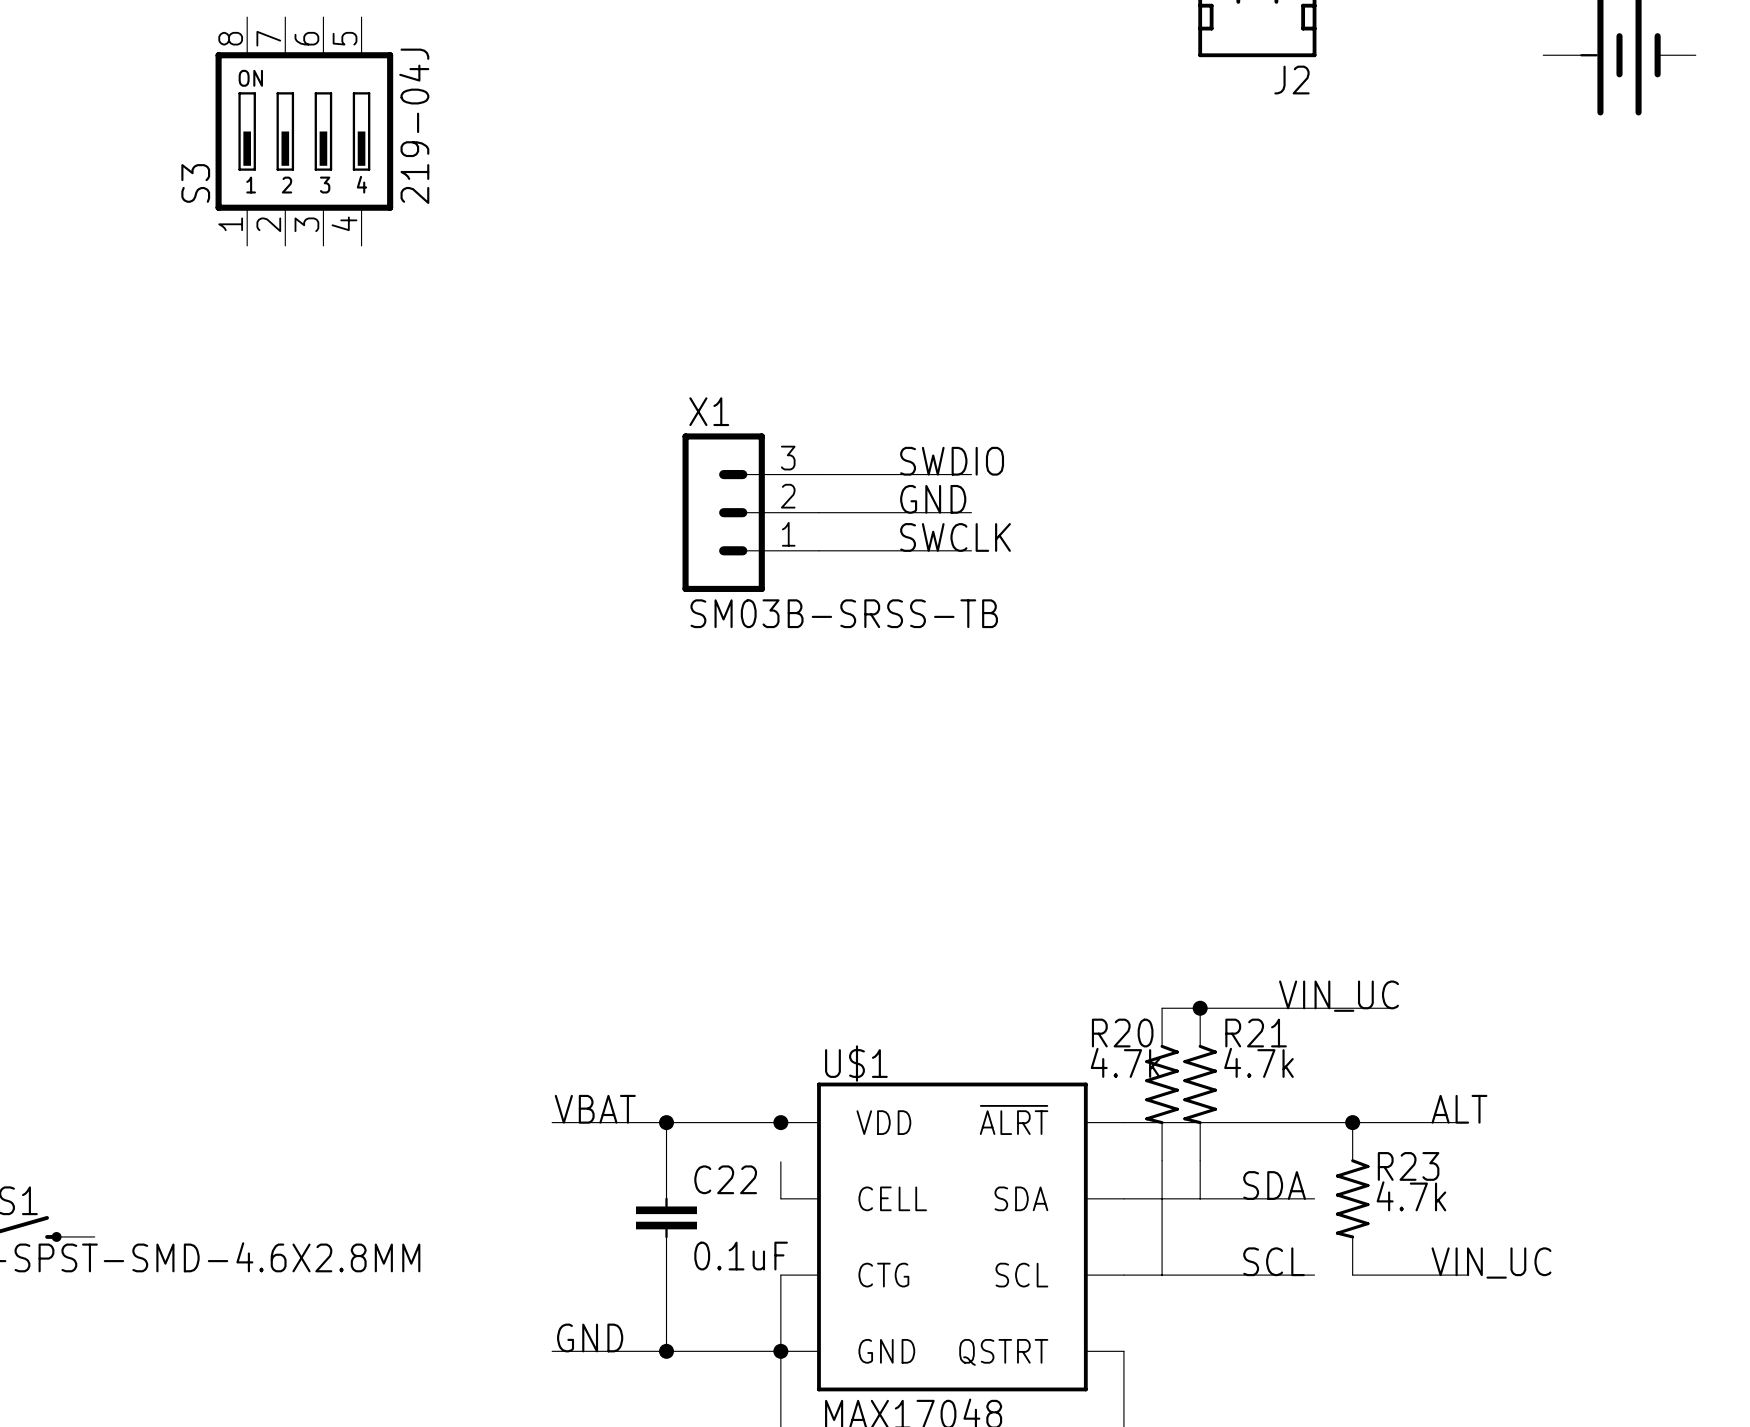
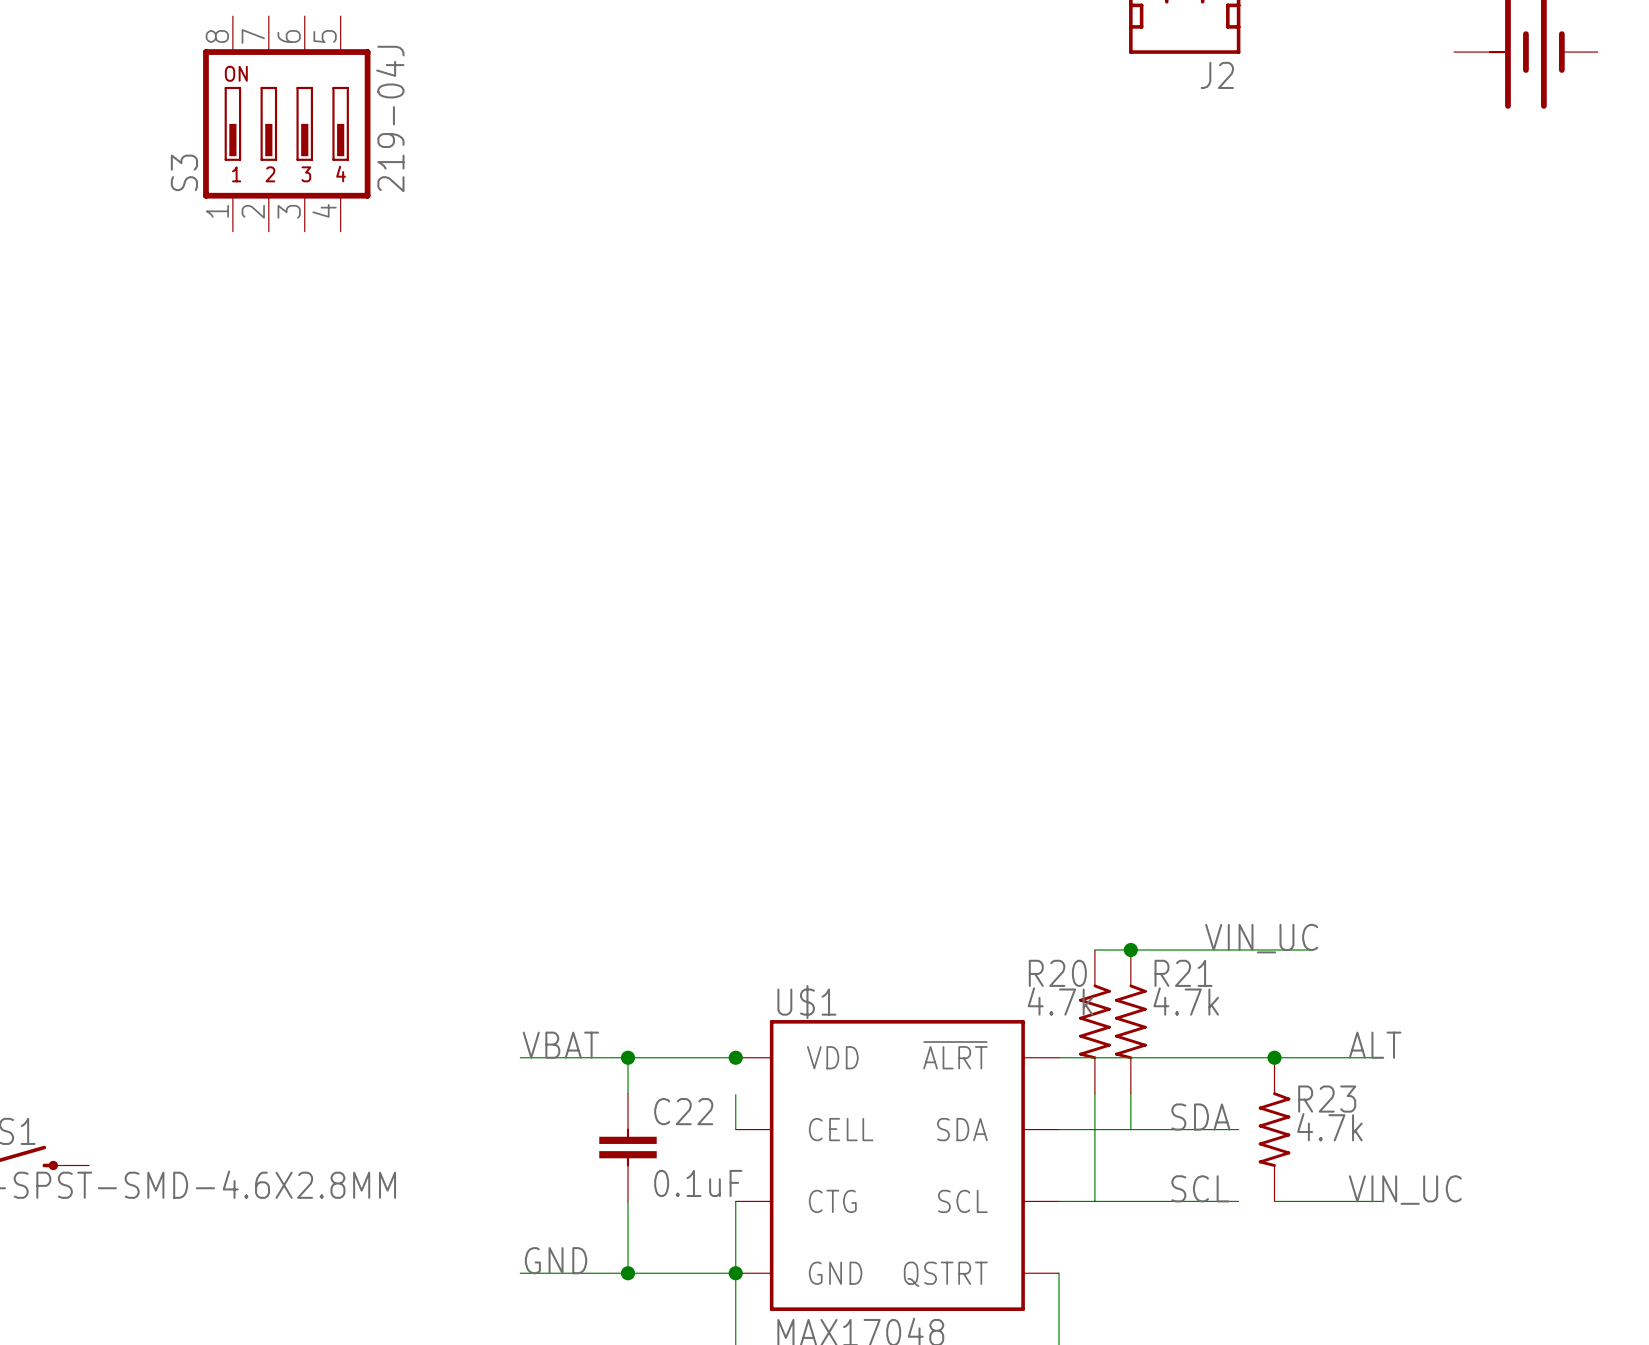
label: SWDIO (952, 461) -> none
wire: (818, 474) (971, 474) -> none
label: GND (933, 499) -> none
X1: SM03B-SRSS-TB (750, 512) -> none
wire: (818, 512) (971, 512) -> none
label: SWCLK (955, 537) -> none
wire: (818, 550) (971, 550) -> none

